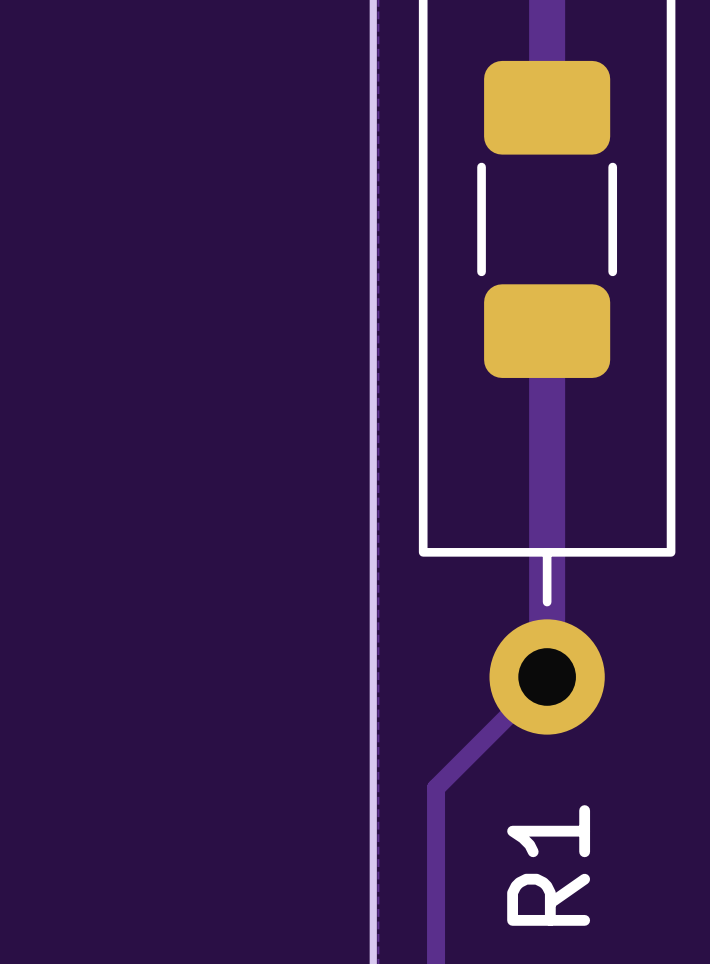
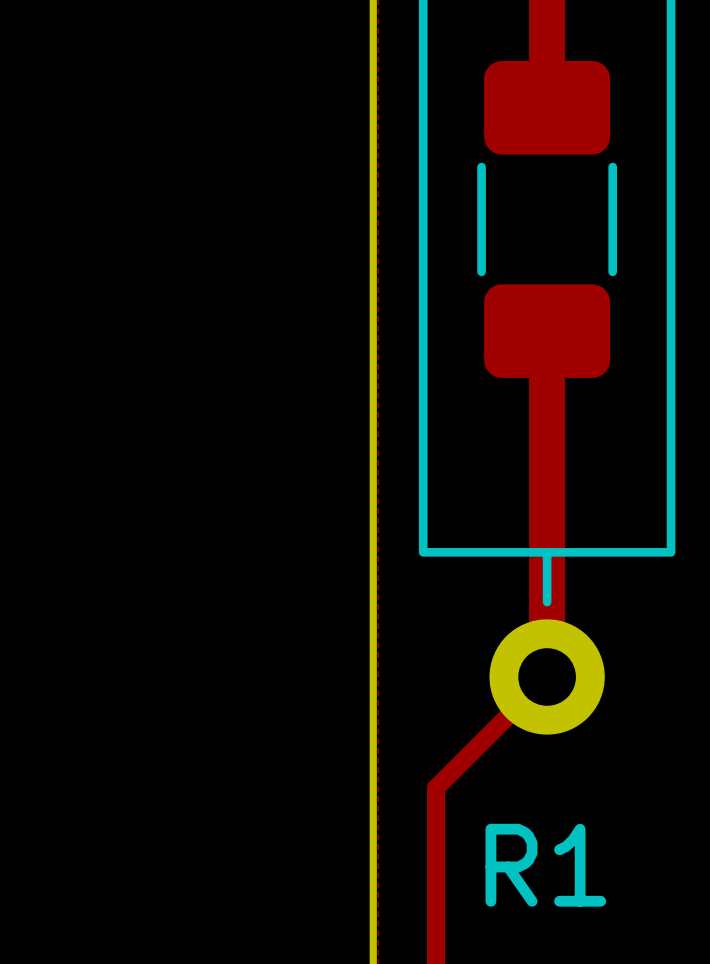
R1 name rotation: 0° (548, 865) -> 90° clockwise (545, 865)

